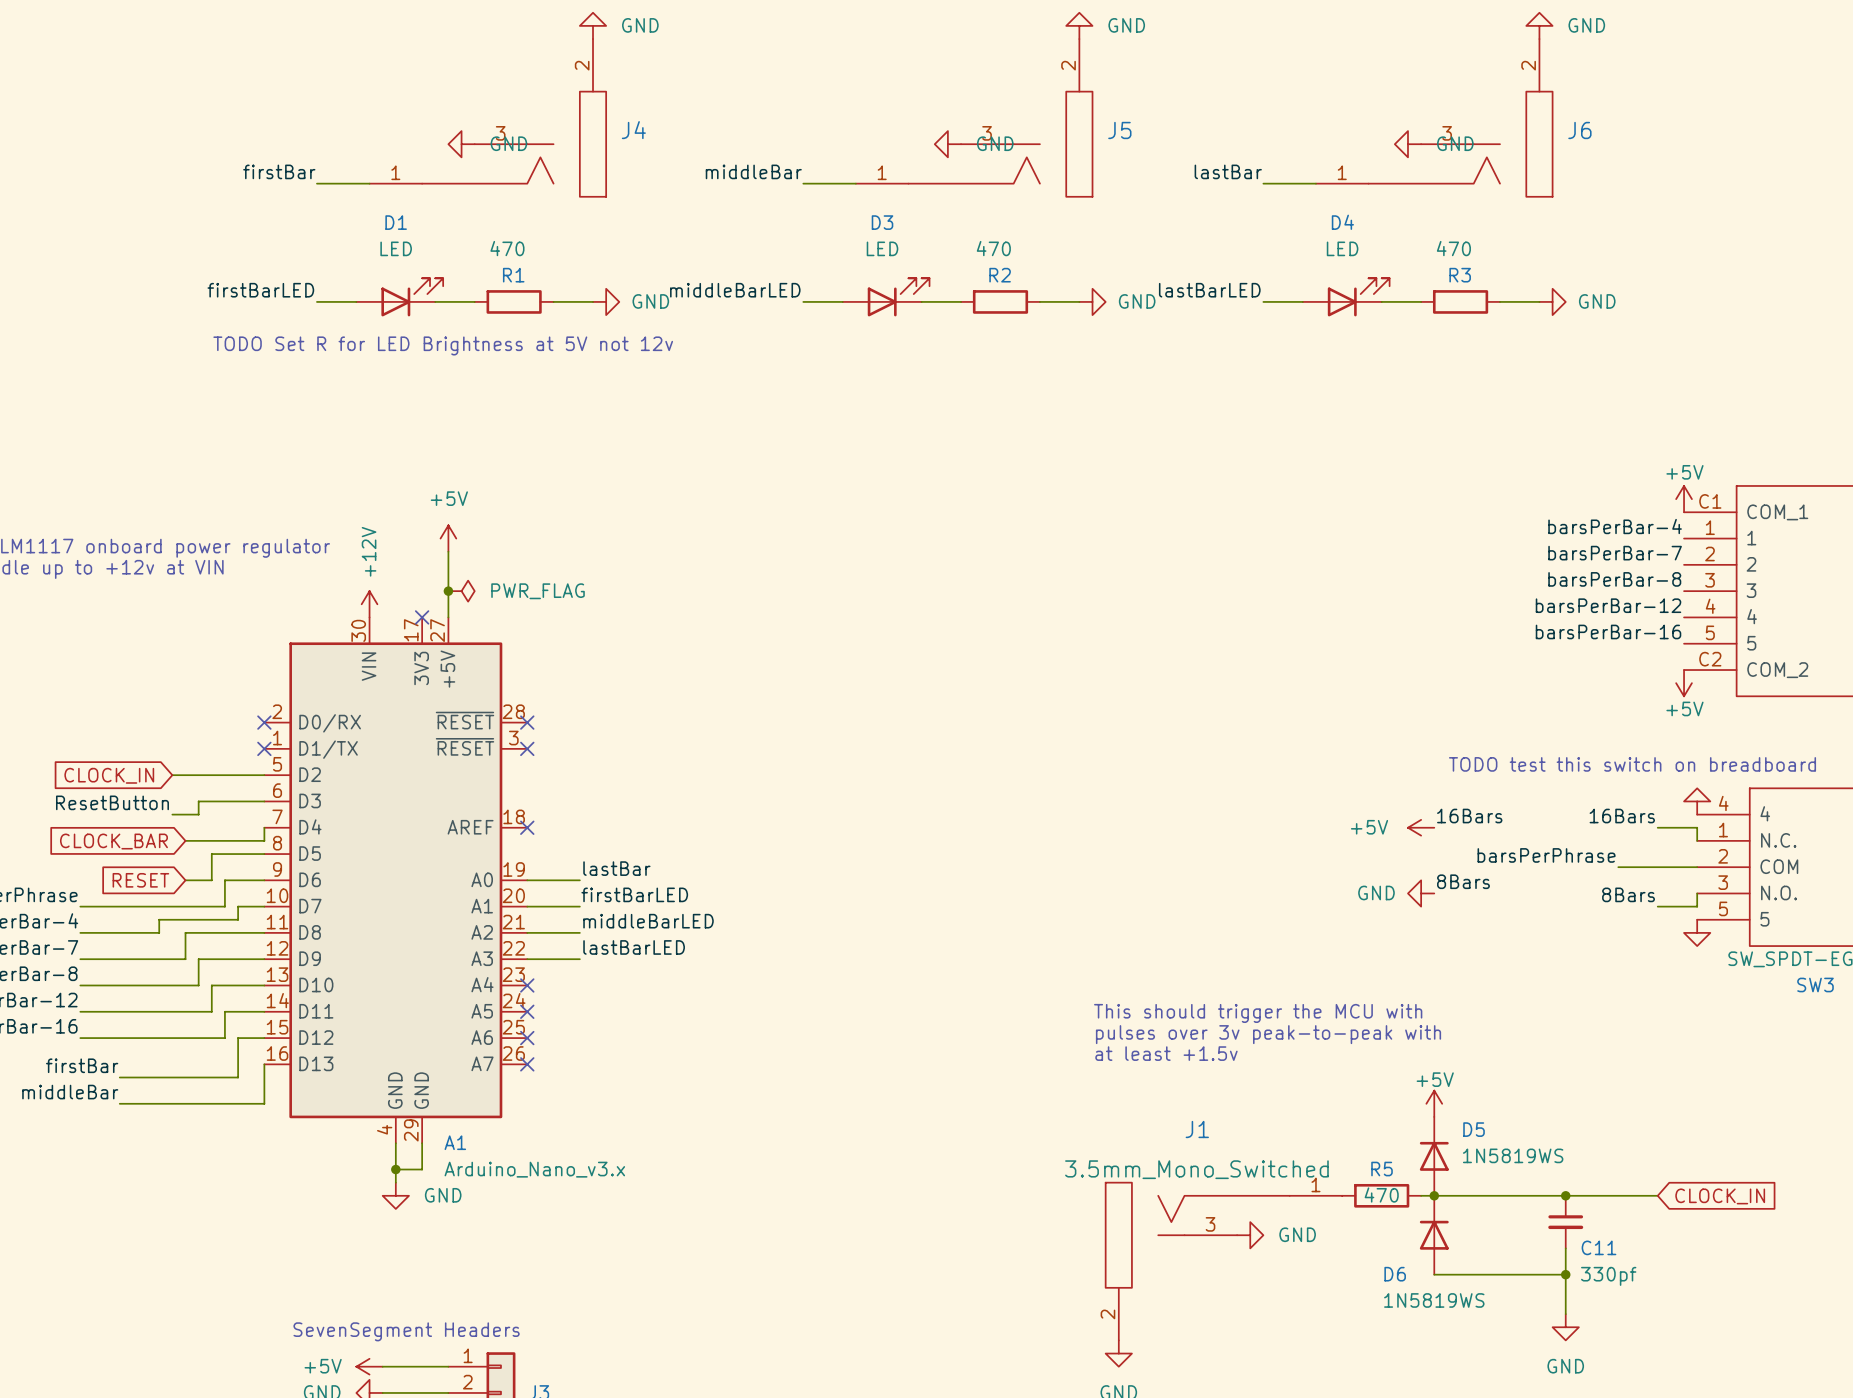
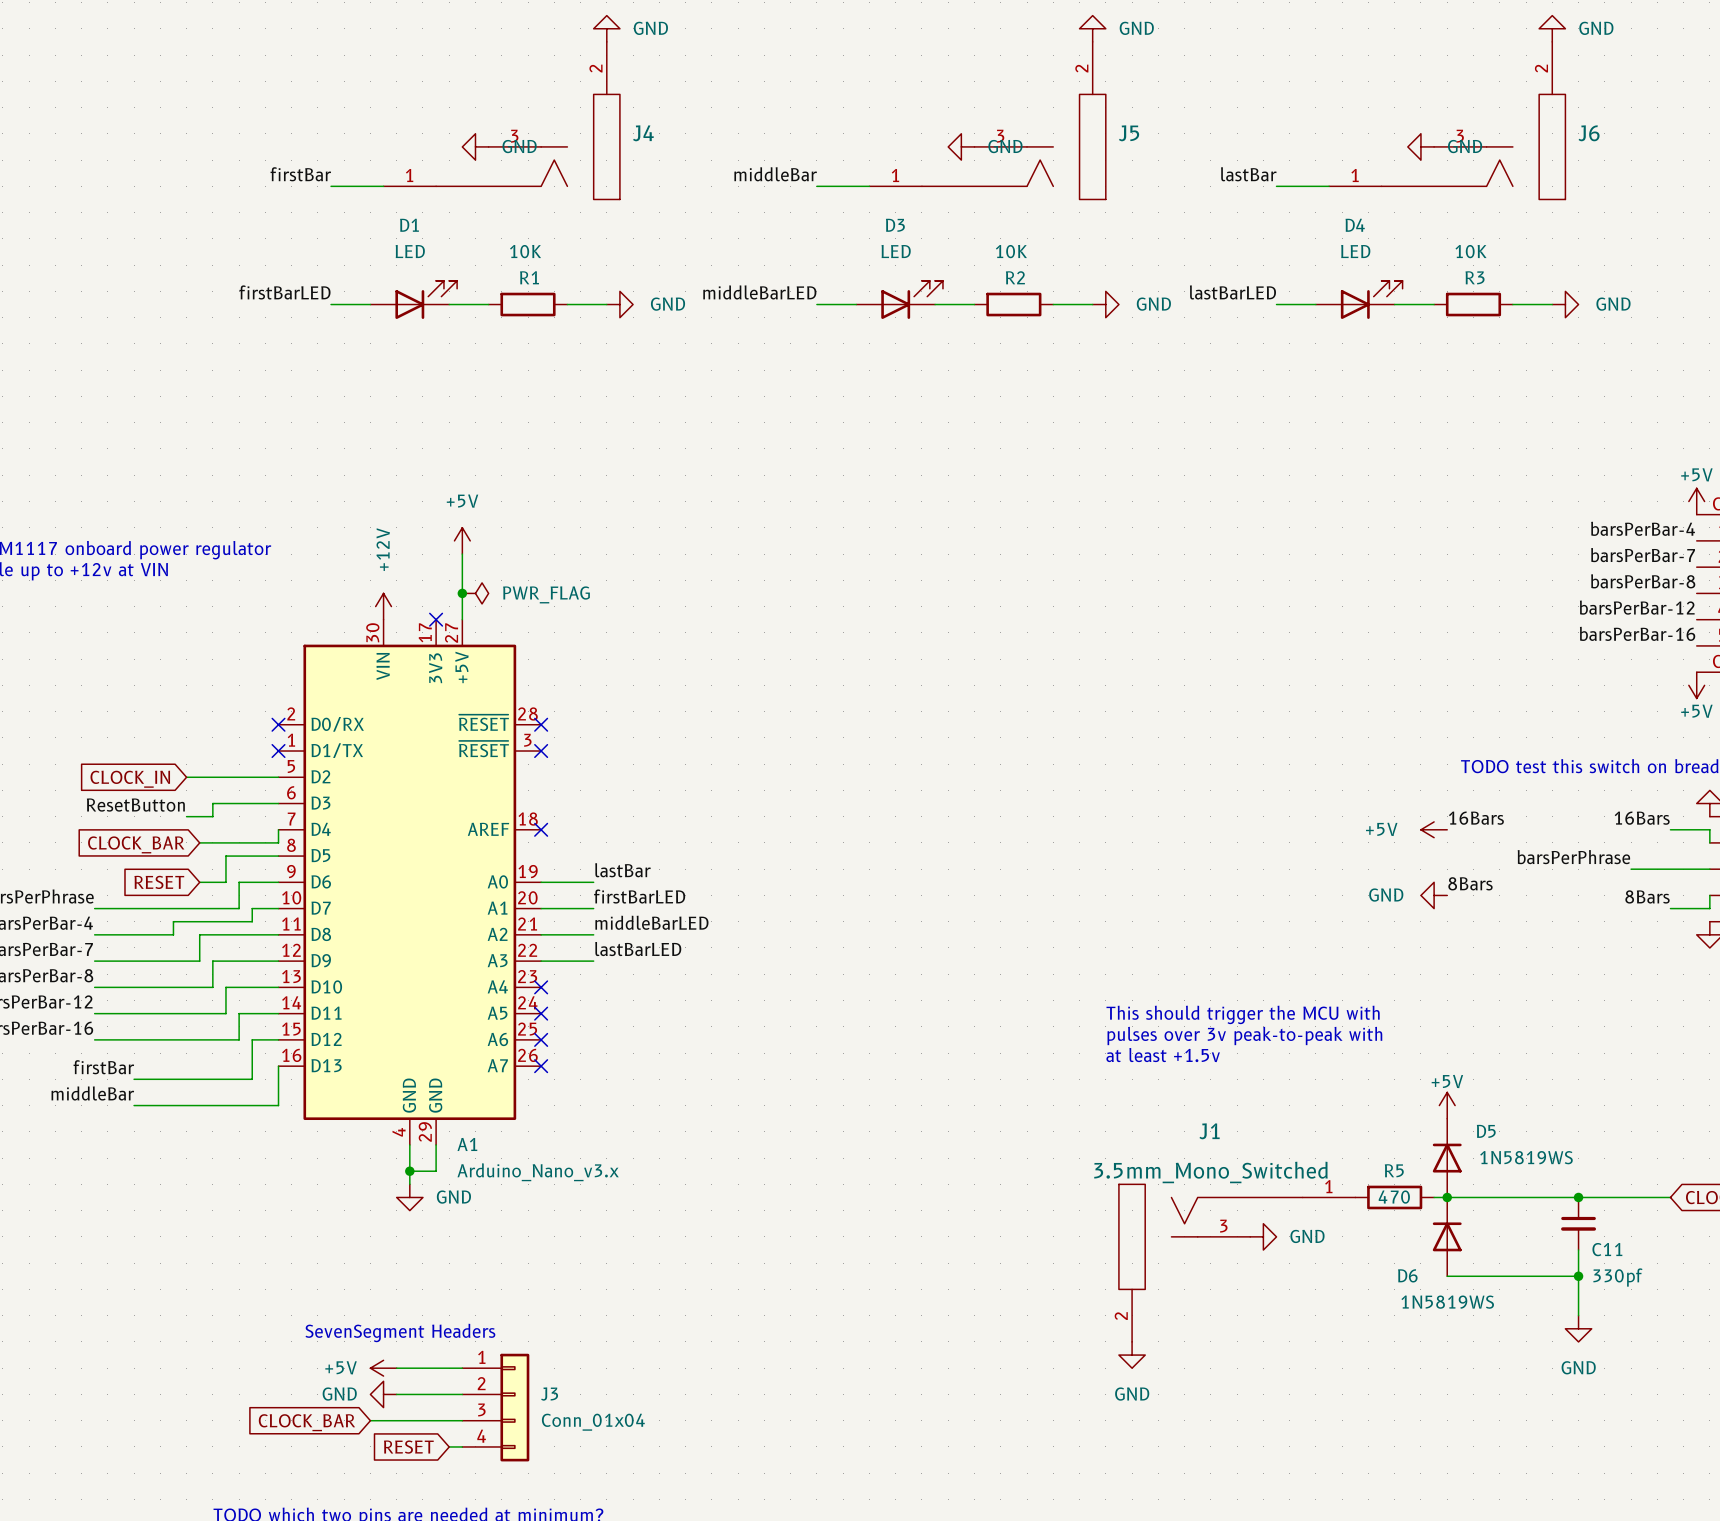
R1 value: 470 (507, 248) -> 10K (525, 251)
R2 value: 470 (993, 248) -> 10K (1011, 251)
R3 value: 470 (1453, 248) -> 10K (1471, 251)
text: TODO Set R for LED Brightness at 5V not 12v (443, 345) -> none

